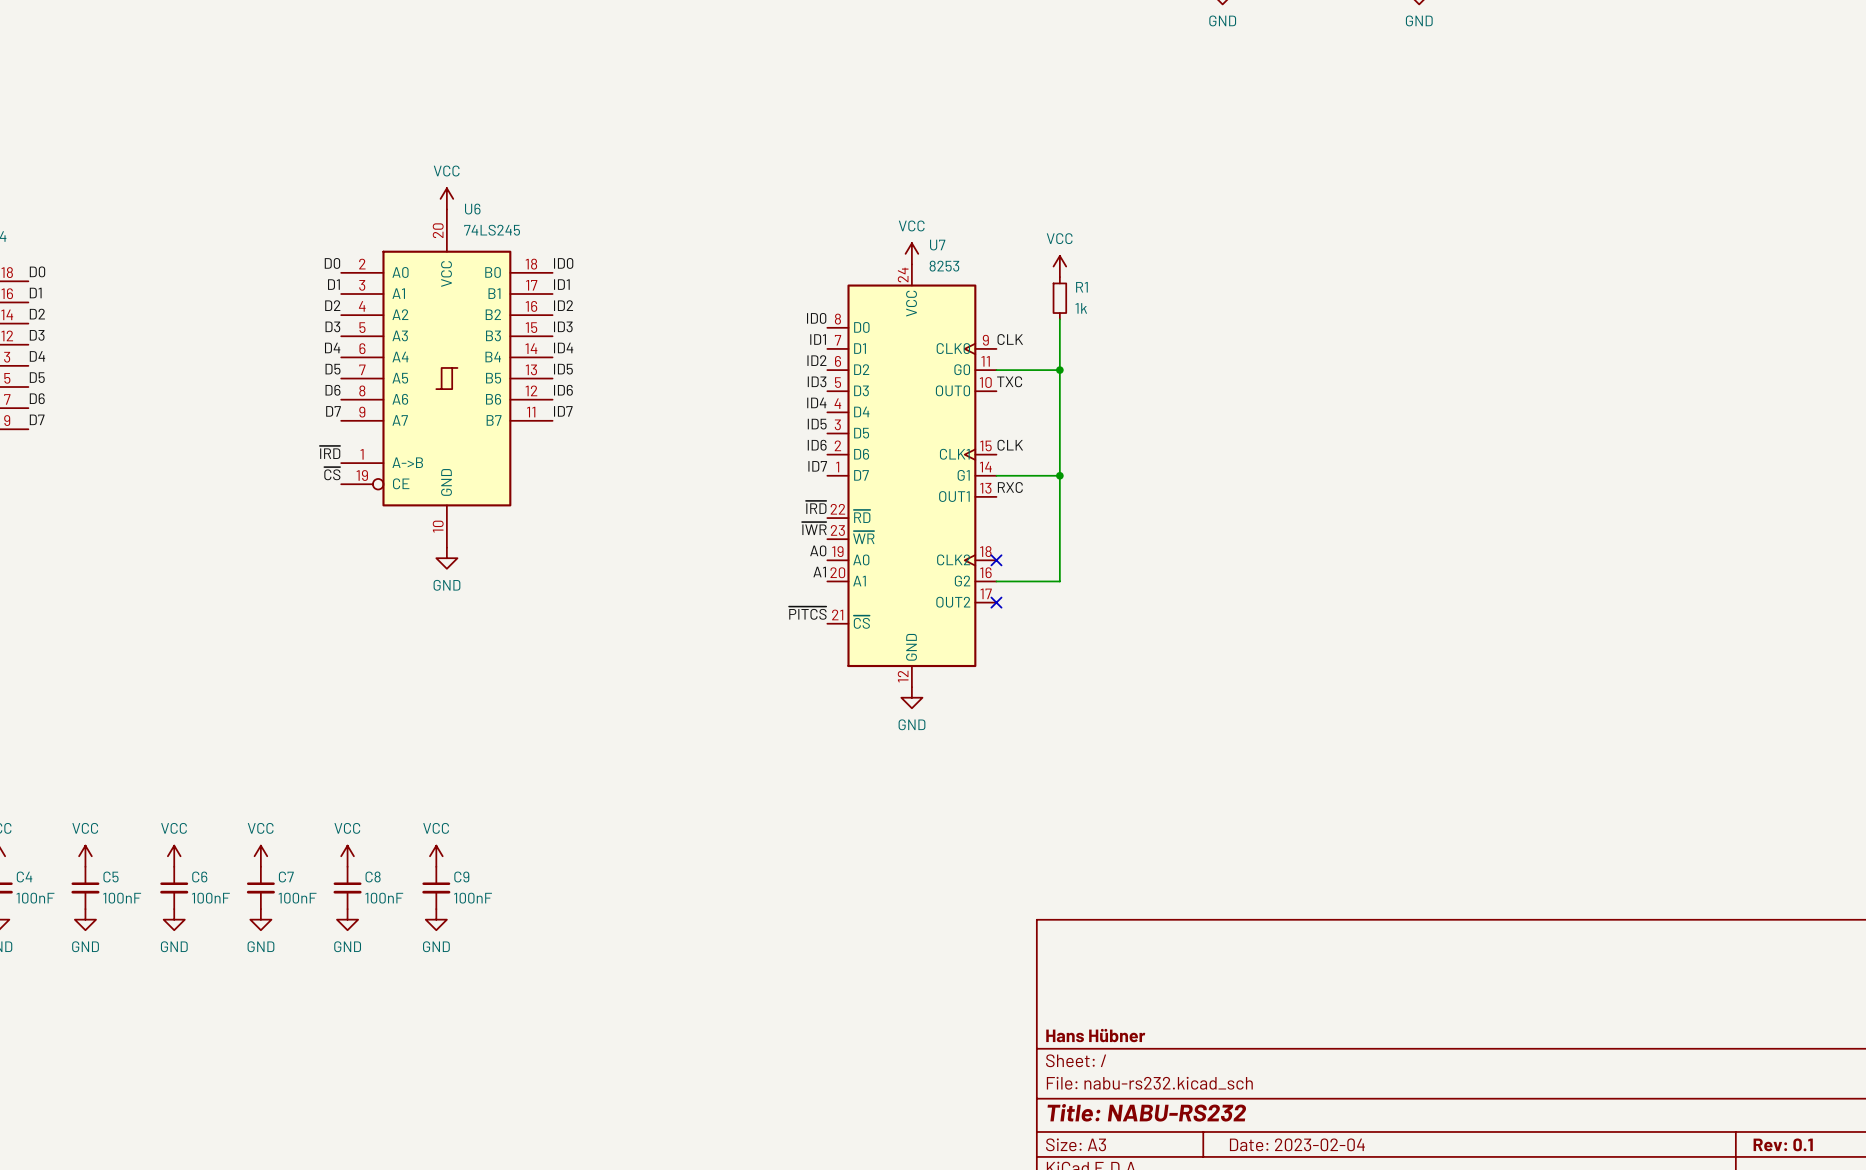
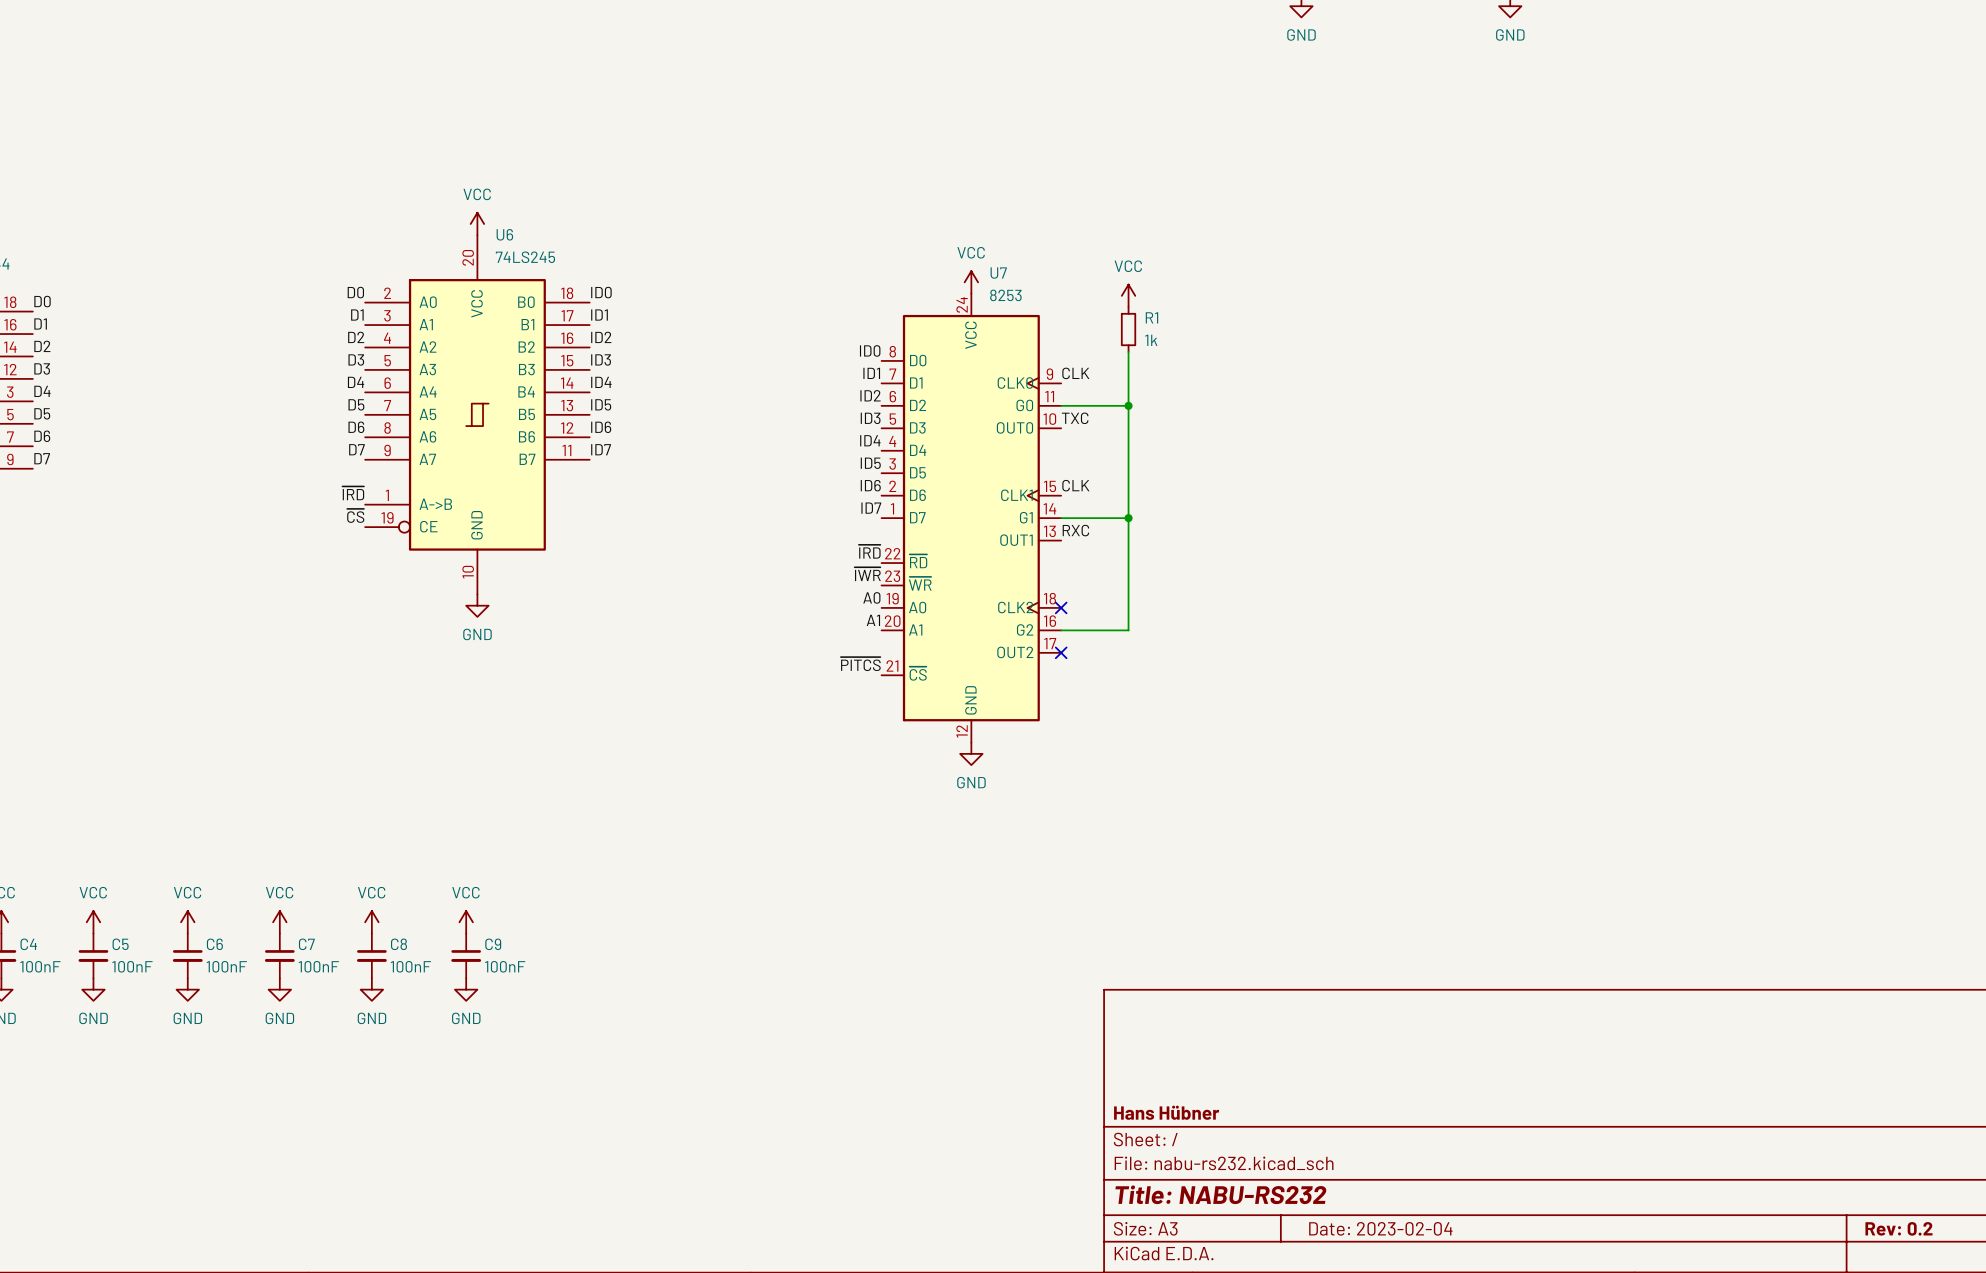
title block: Rev: 0.1 (1783, 1144) -> Rev: 0.2 (1898, 1228)

